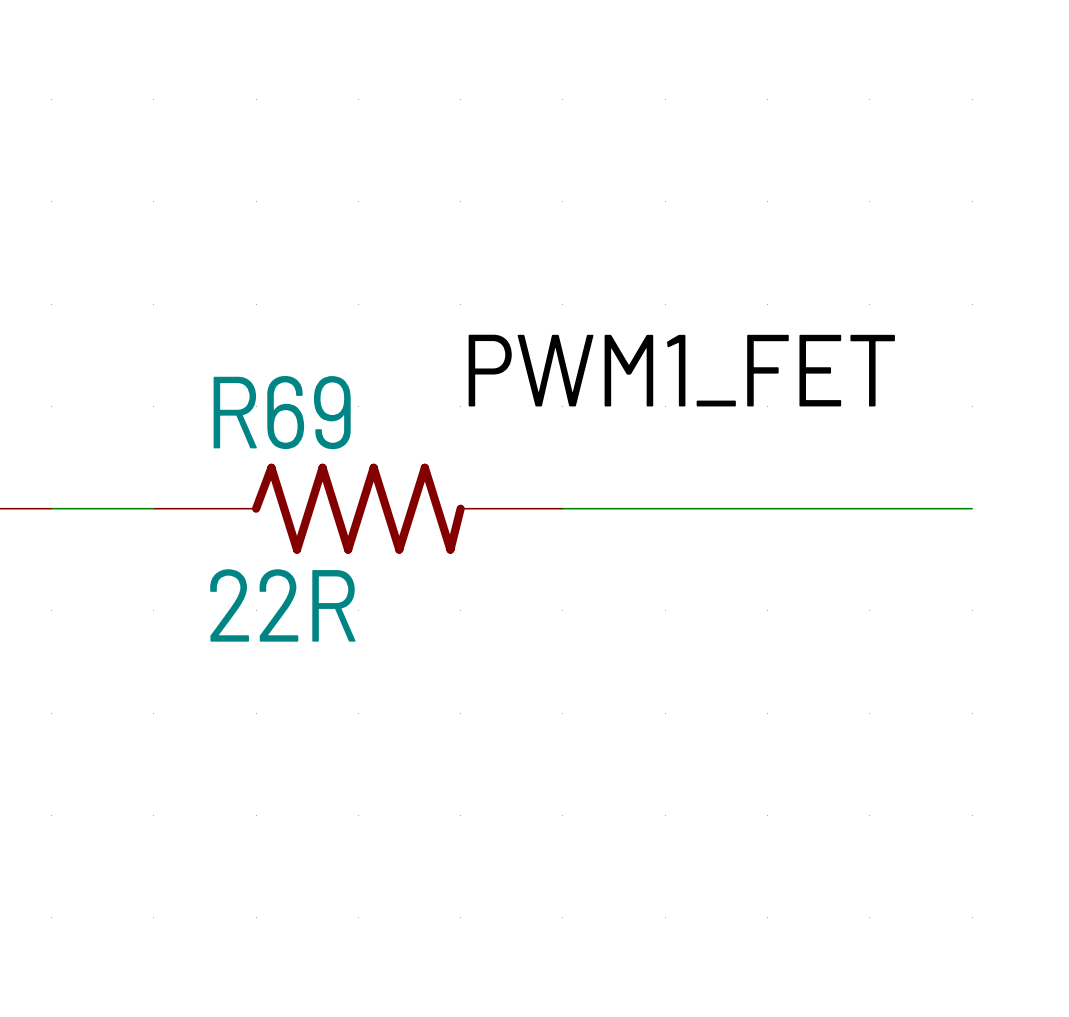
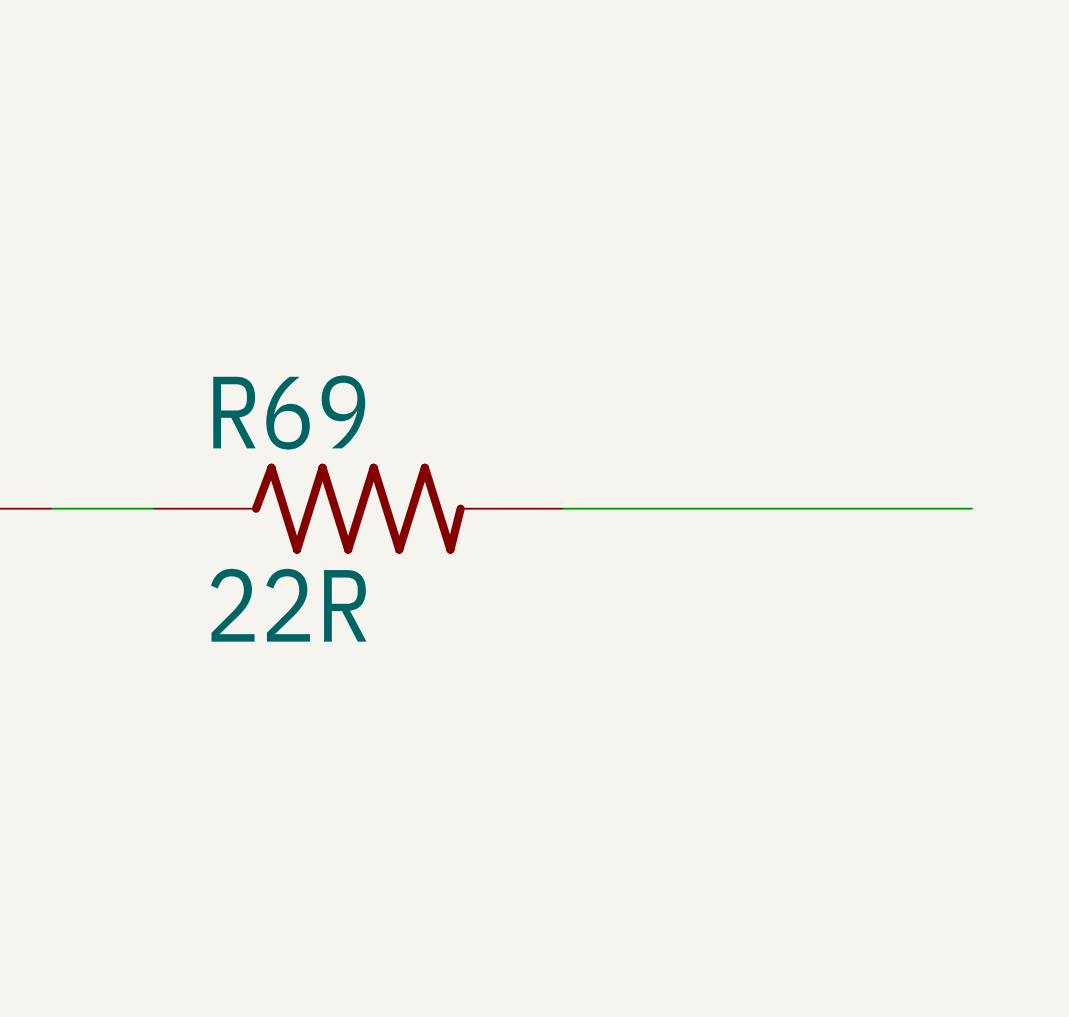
label: PWM1_FET (681, 370) -> none

